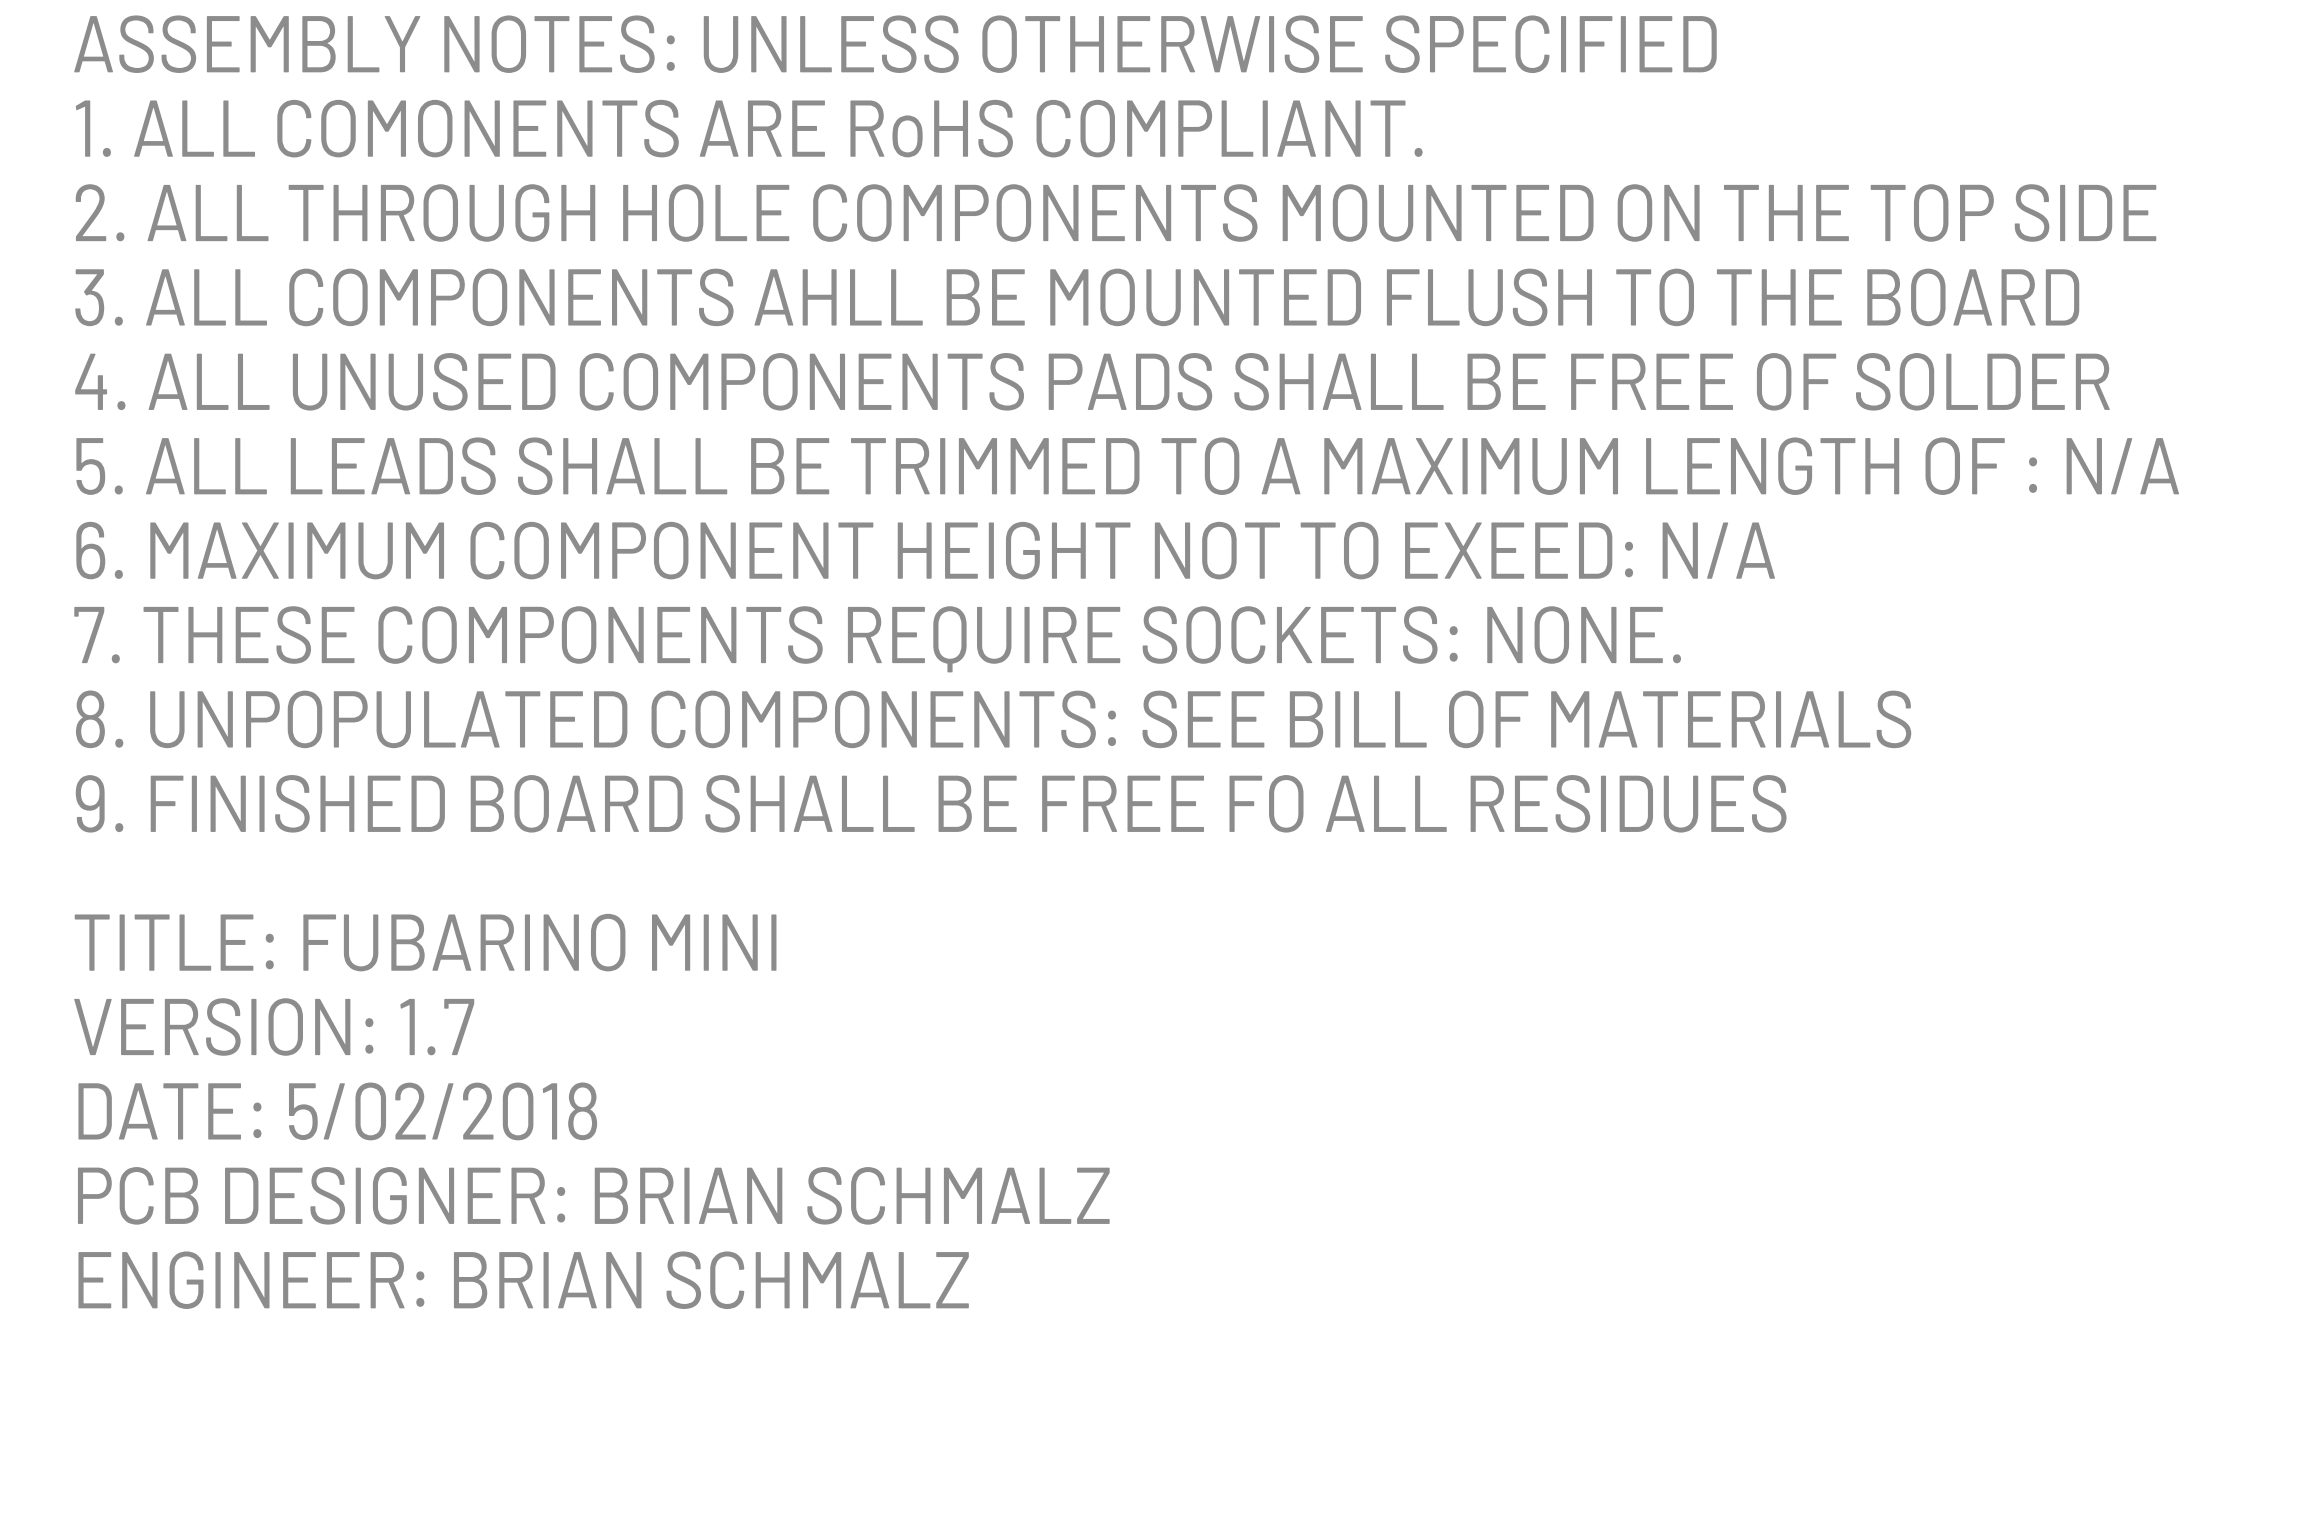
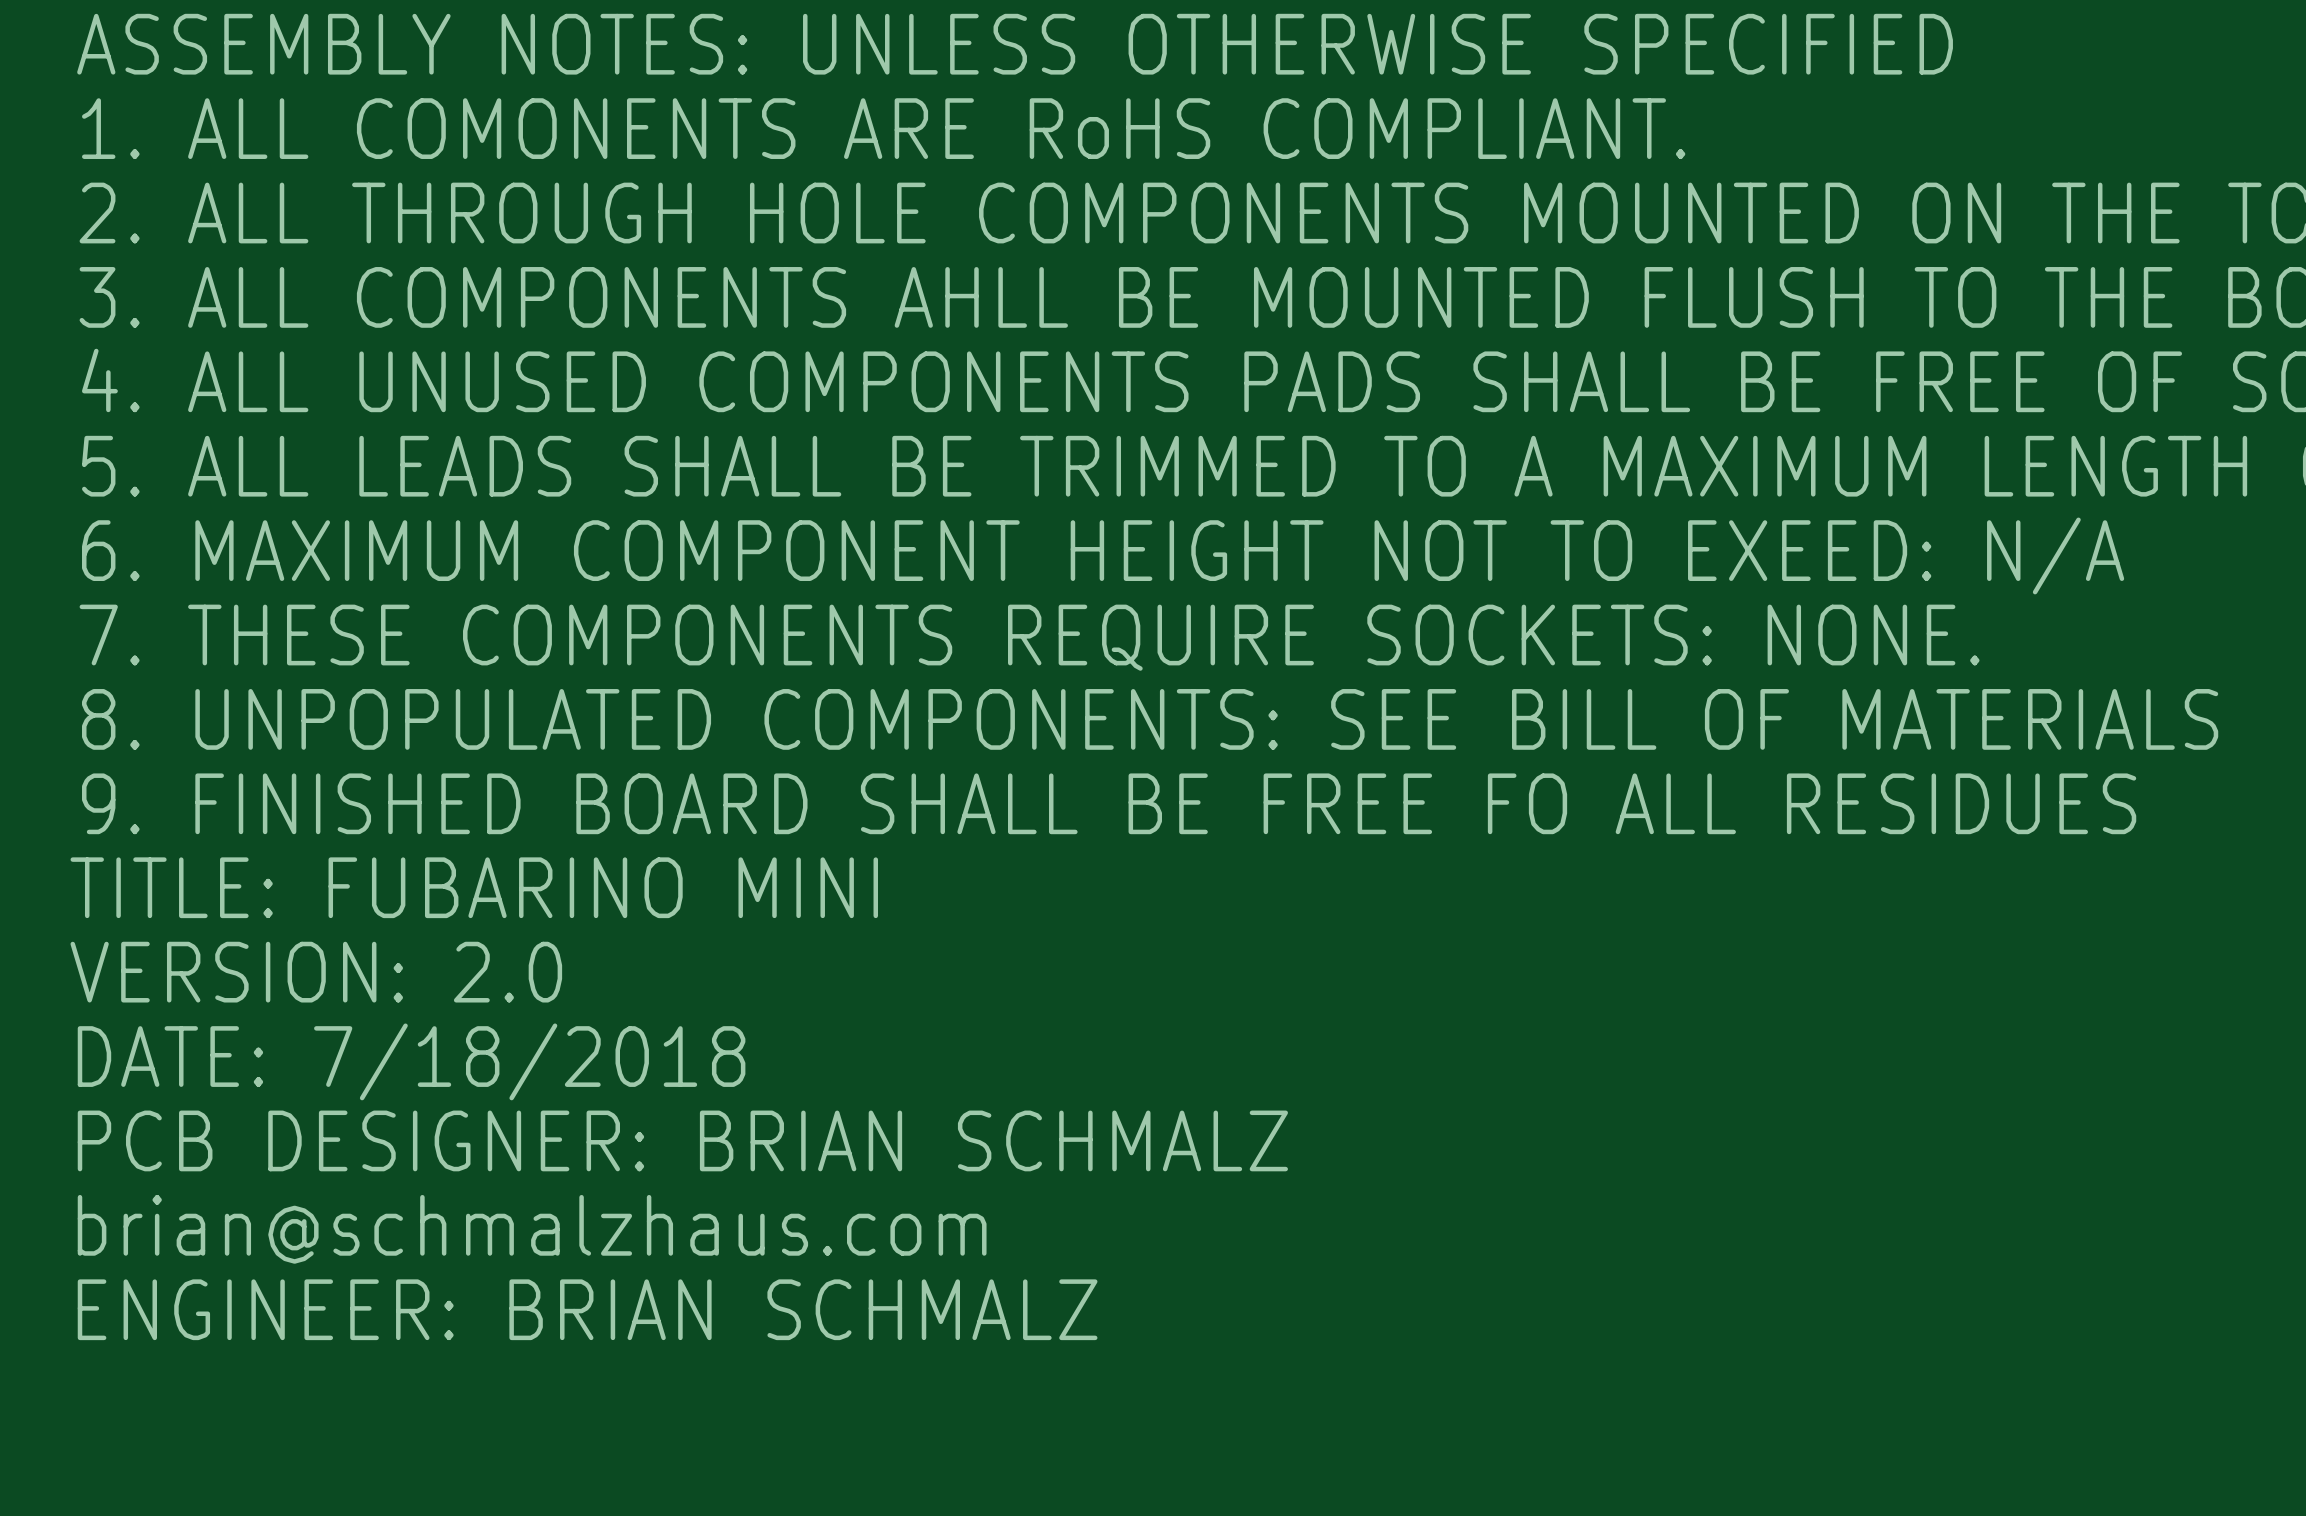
text position: TITLE: FUBARINO MINI (425, 942) -> TITLE: FUBARINO MINI (474, 887)
text: VERSION: 1.7 (274, 1027) -> VERSION: 2.0 (316, 972)
text: DATE: 5/02/2018 (337, 1111) -> DATE: 7/18/2018 (411, 1061)
text position: PCB DESIGNER: BRIAN SCHMALZ (593, 1195) -> PCB DESIGNER: BRIAN SCHMALZ (682, 1140)
text: none -> brian@schmalzhaus.com (532, 1229)
text position: ENGINEER: BRIAN SCHMALZ (523, 1280) -> ENGINEER: BRIAN SCHMALZ (587, 1309)

